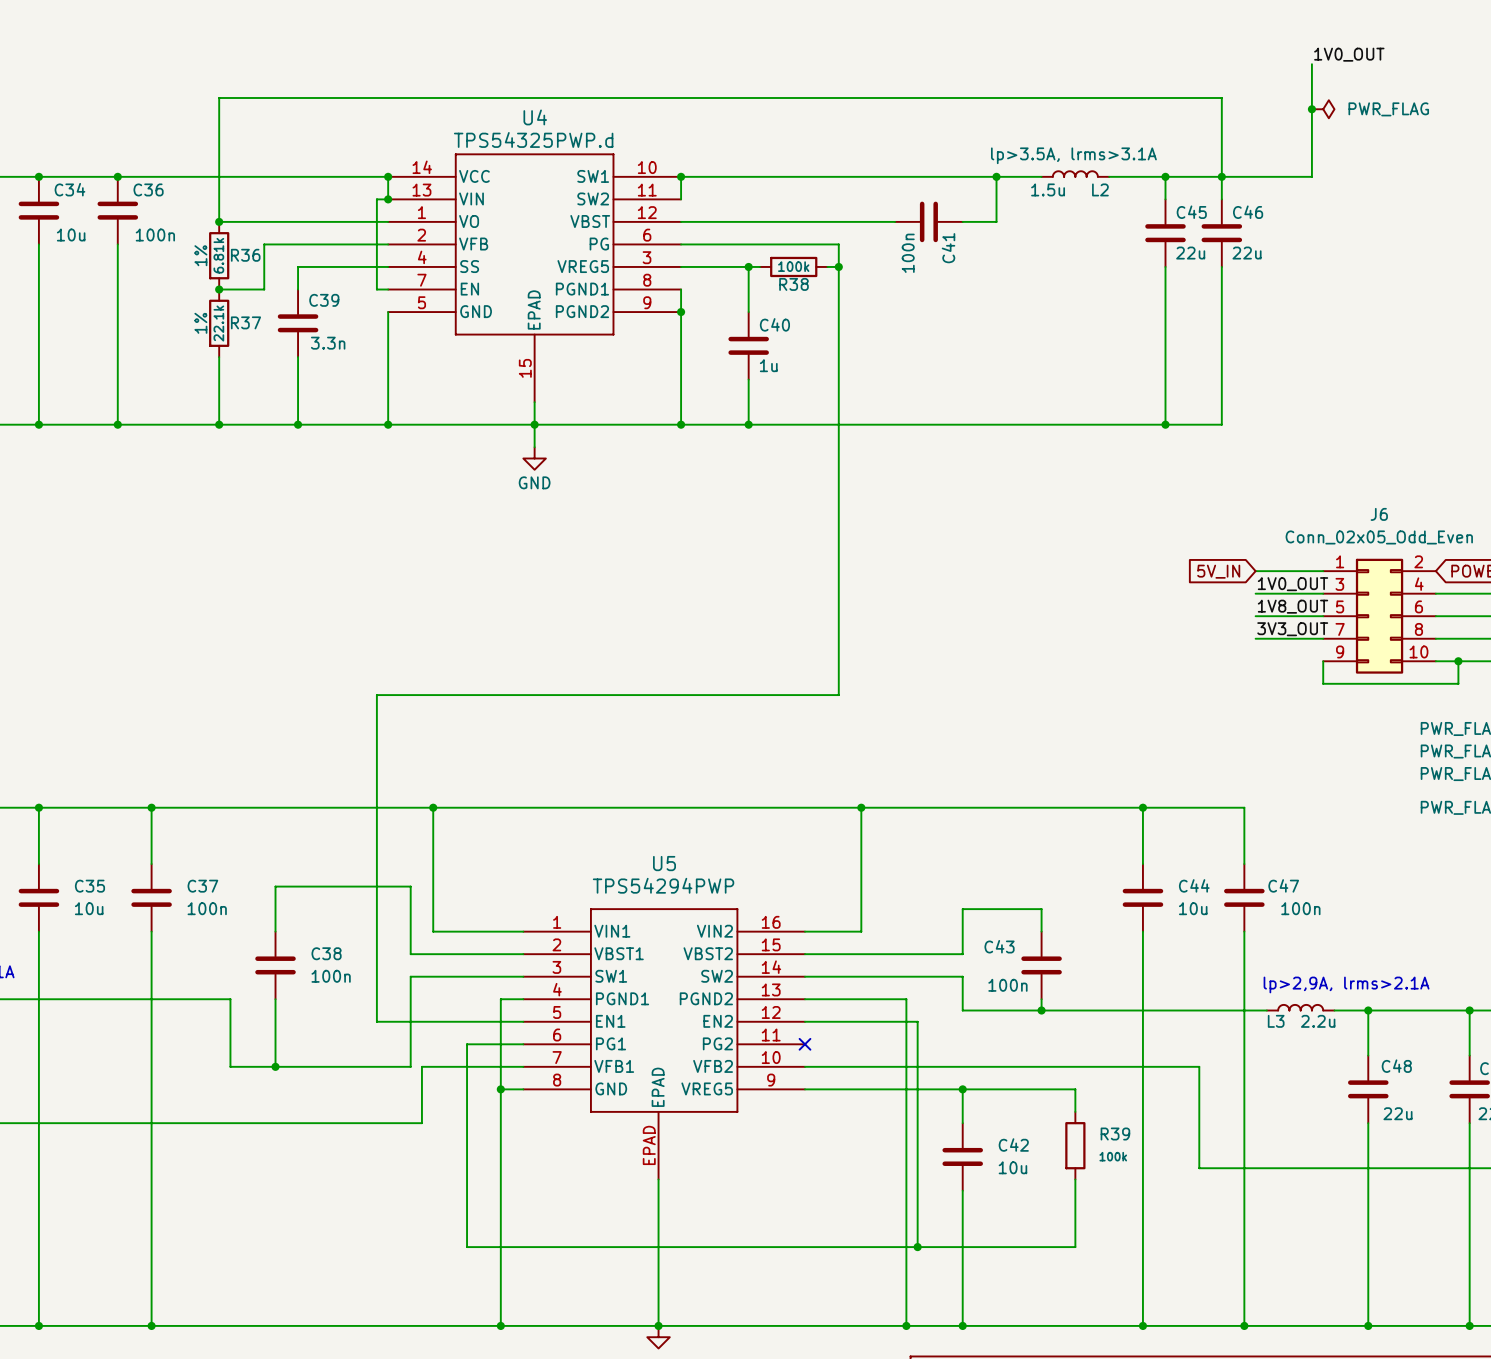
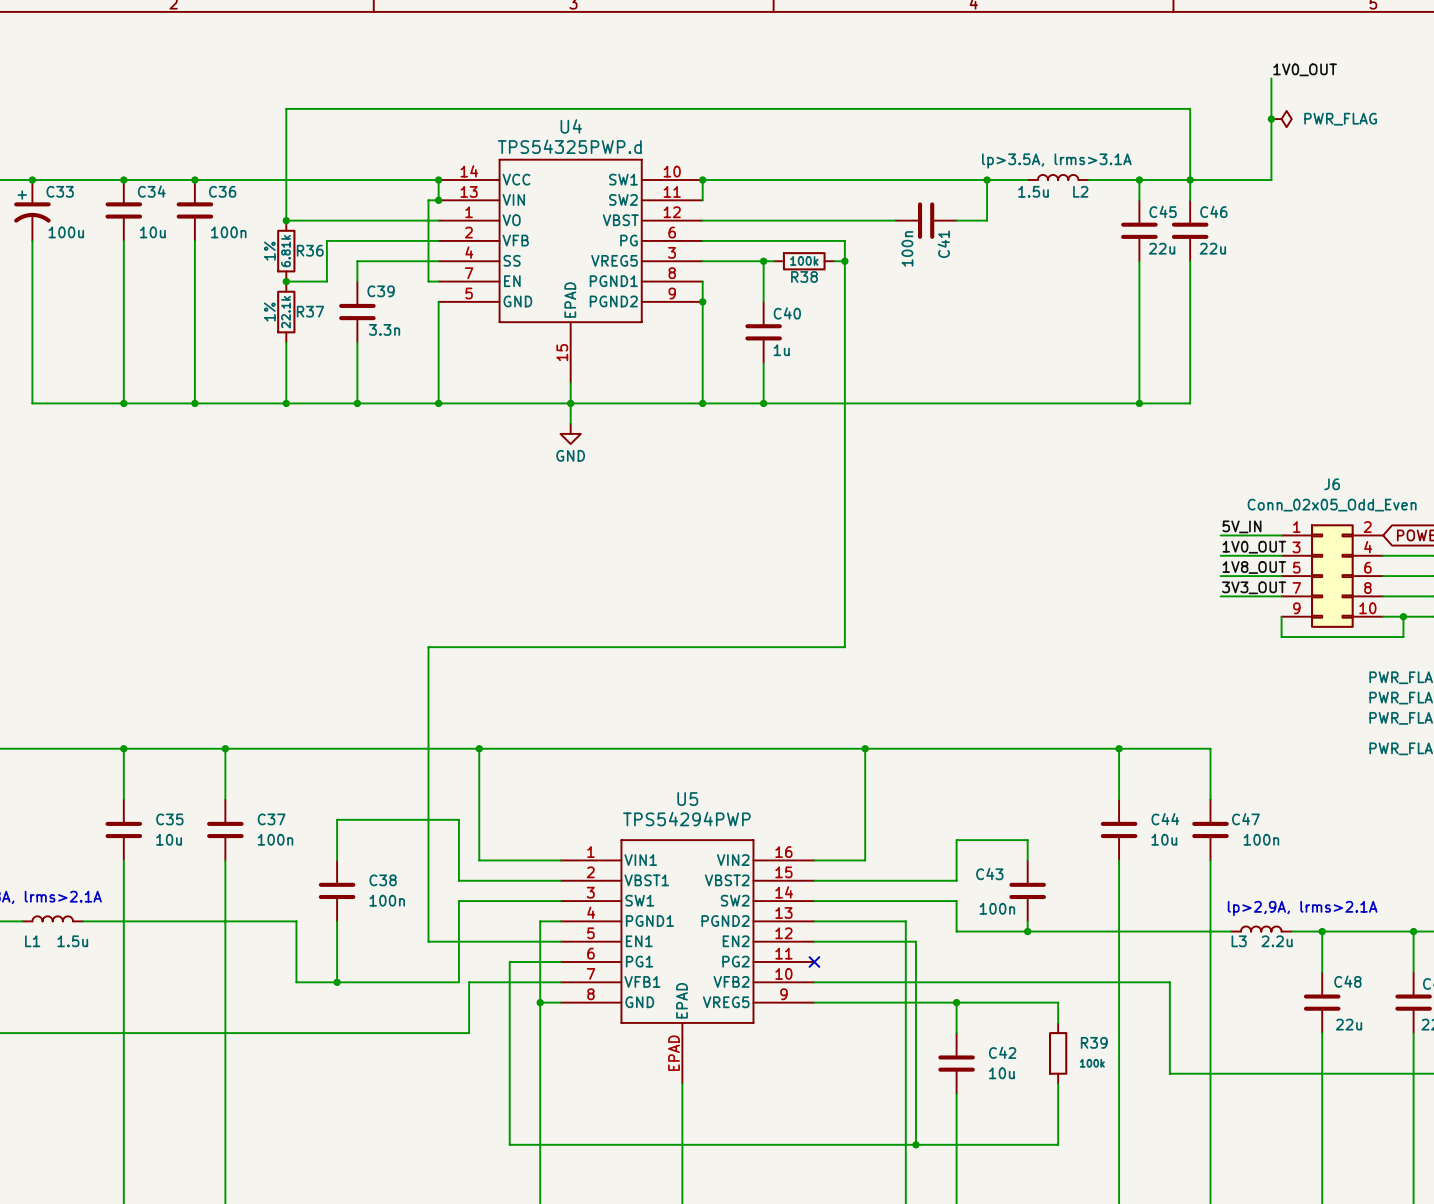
label: none -> 5V_IN (1241, 526)
global label: 5V_IN (1218, 571) -> none

